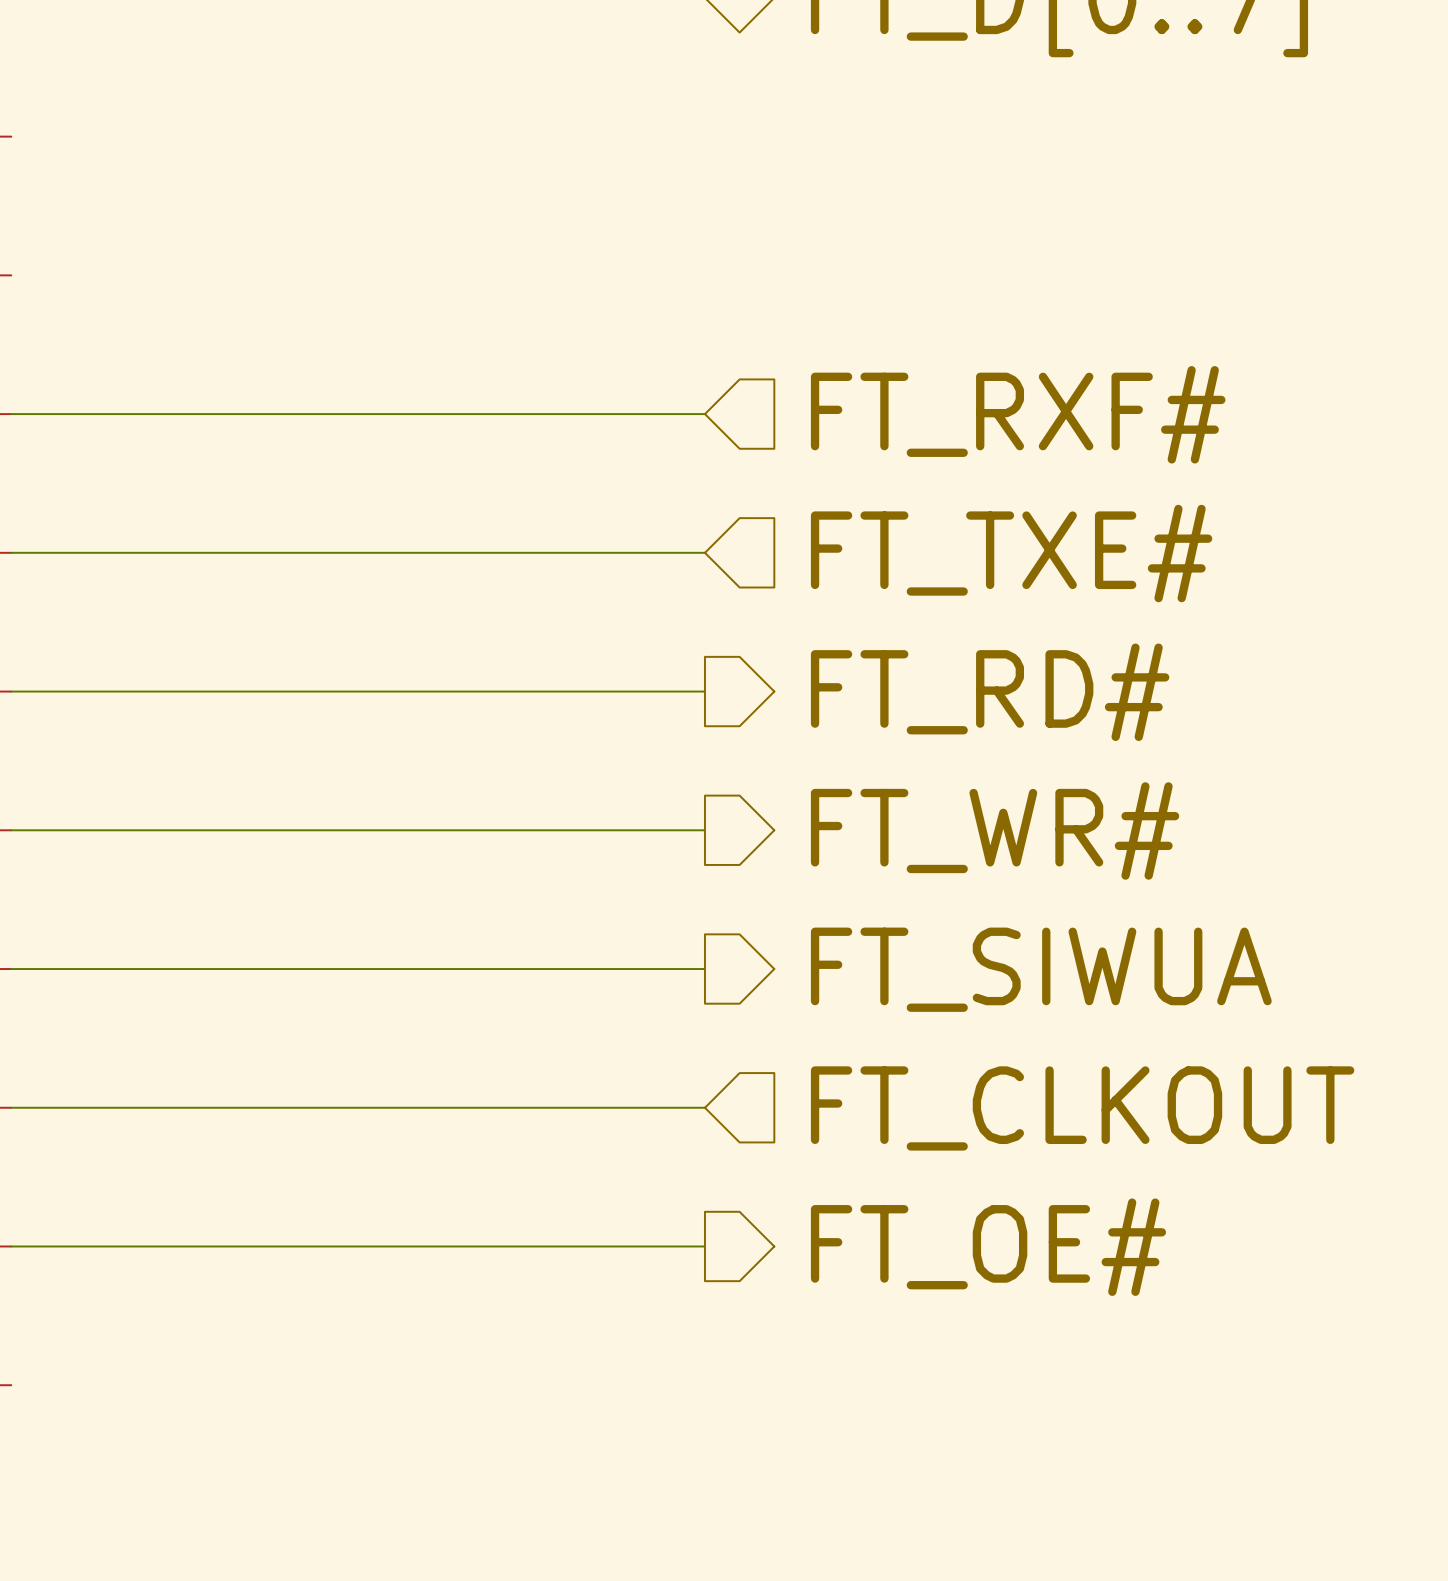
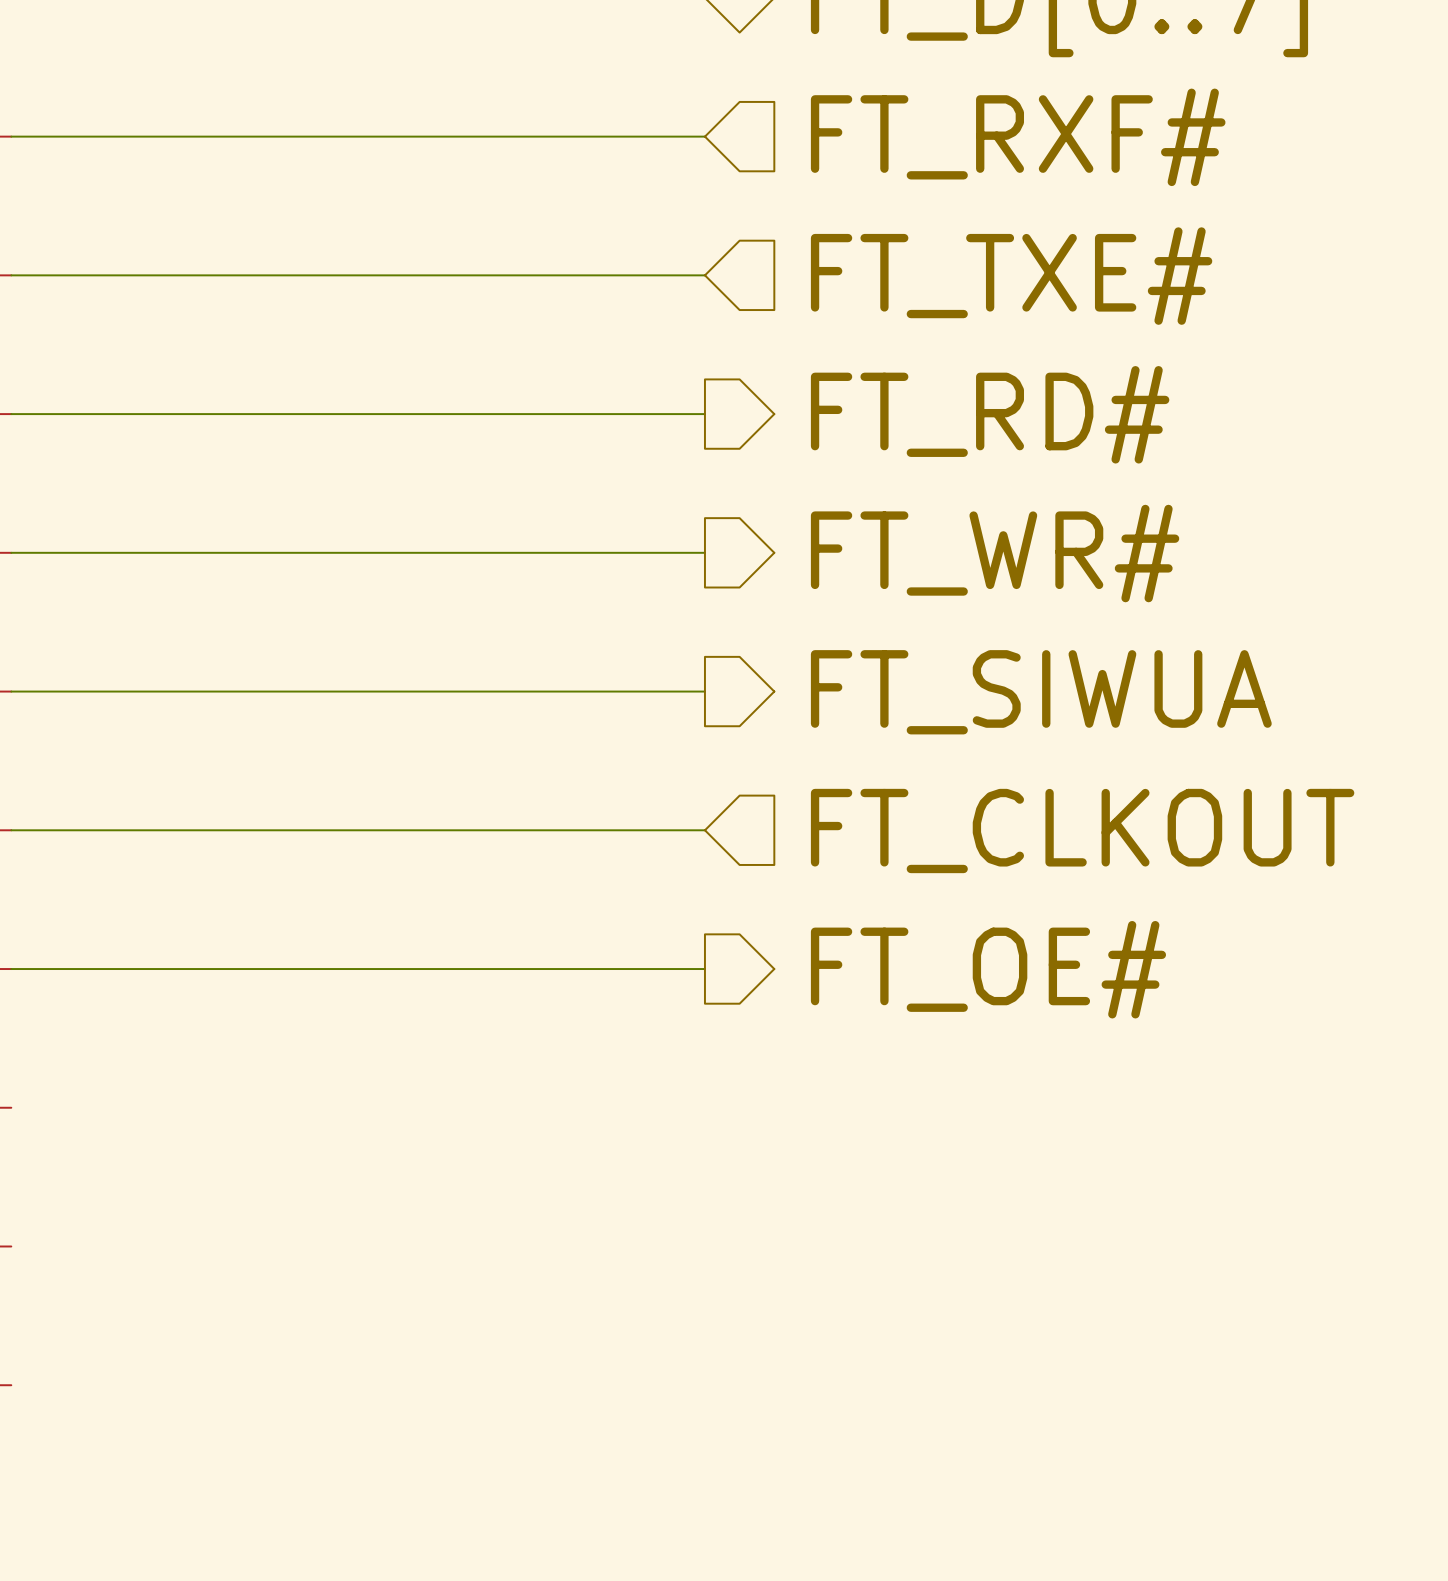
hierarchical label: none -> FT_RXF# (1018, 137)
hierarchical label: none -> FT_TXE# (1011, 276)
hierarchical label shape: input (1018, 414) -> output (990, 414)
hierarchical label: FT_RXF# (1018, 414) -> FT_RD# (990, 414)
hierarchical label shape: input (1011, 553) -> output (995, 553)
hierarchical label: FT_TXE# (1011, 553) -> FT_WR# (995, 553)
hierarchical label: FT_RD# (990, 692) -> FT_SIWUA (1041, 692)
hierarchical label shape: output (995, 831) -> input (1082, 831)
hierarchical label: FT_WR# (995, 831) -> FT_CLKOUT (1082, 831)
hierarchical label: FT_SIWUA (1041, 969) -> FT_OE# (988, 969)
wire: (11, 1107) (704, 1107) -> (11, 136) (704, 136)
hierarchical label: FT_CLKOUT (1082, 1108) -> none
wire: (11, 1246) (704, 1246) -> (11, 275) (704, 275)
hierarchical label: FT_OE# (988, 1247) -> none

